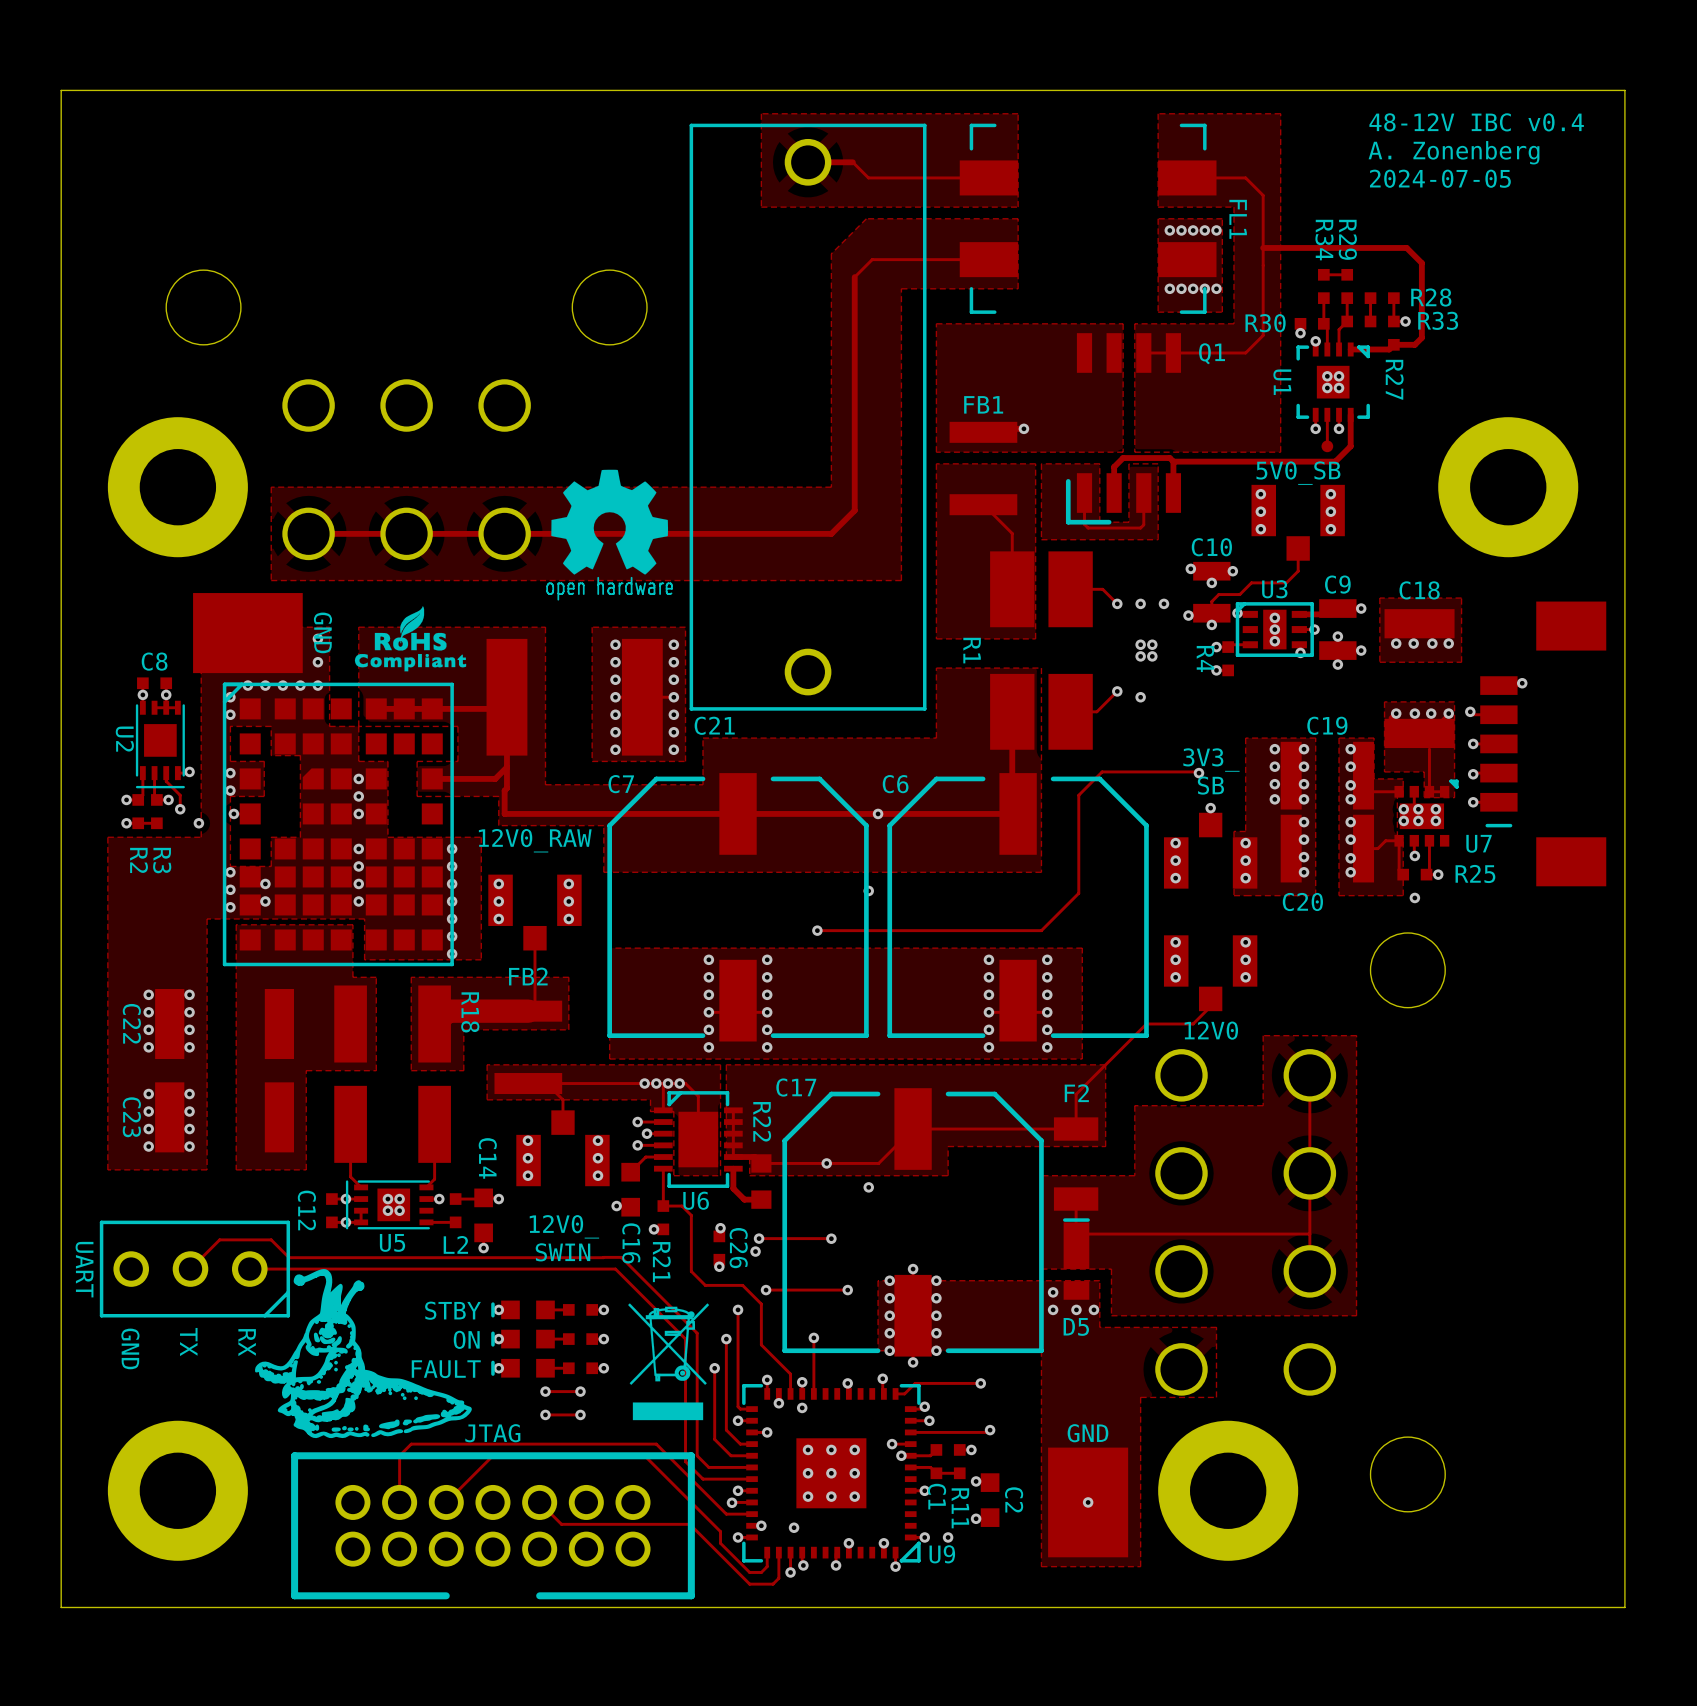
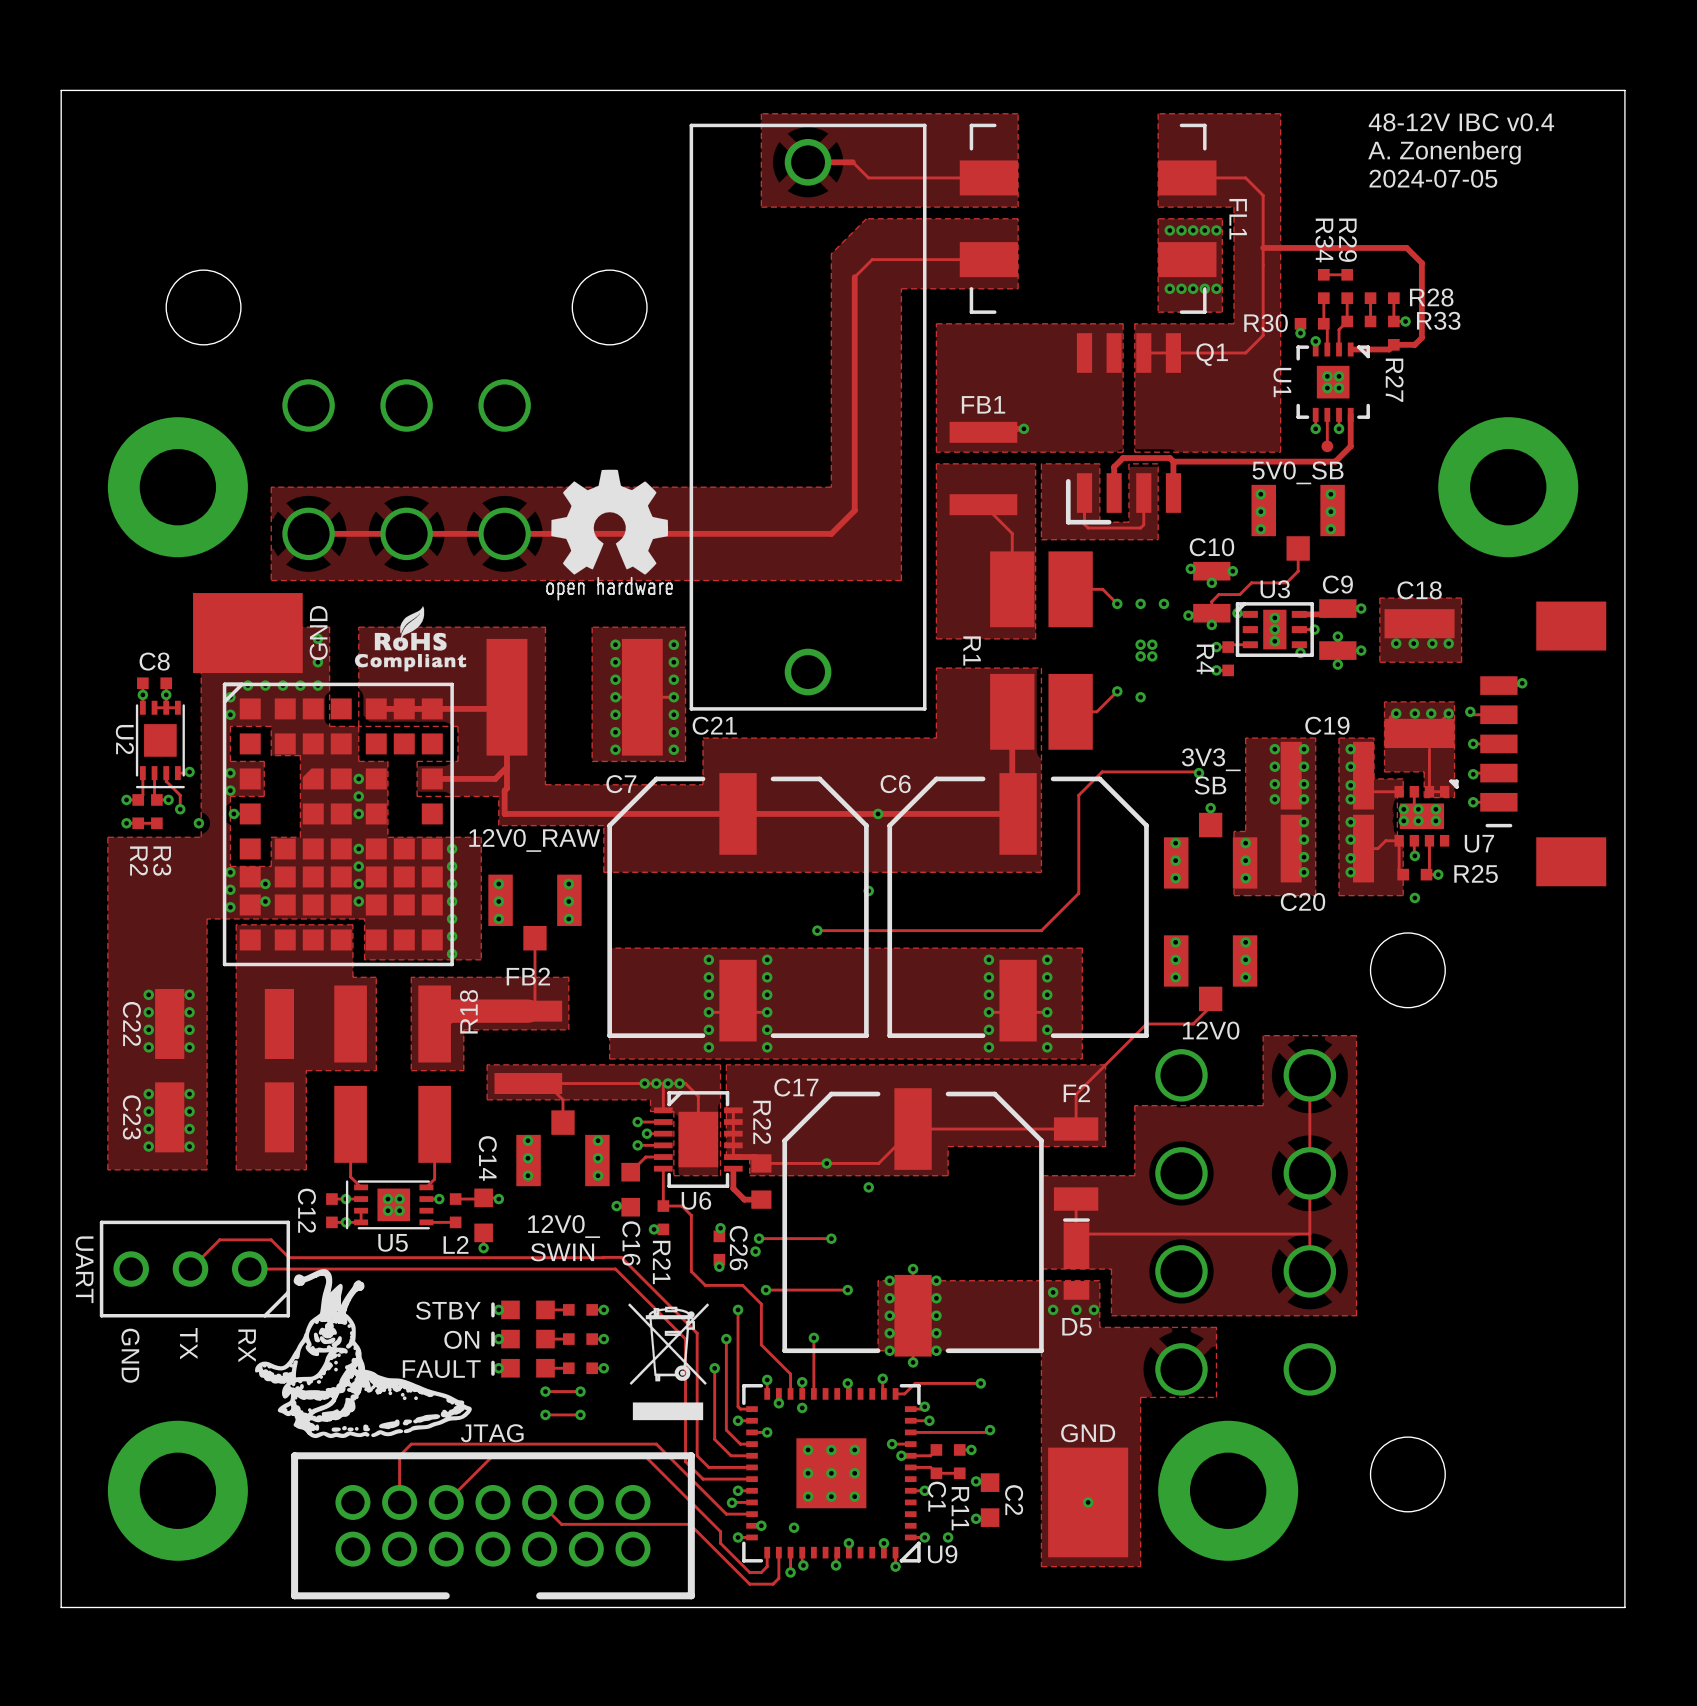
text rotation: 0° (322, 632) -> 180° (318, 633)
R18 name rotation: 0° (470, 1012) -> 180° (468, 1011)

